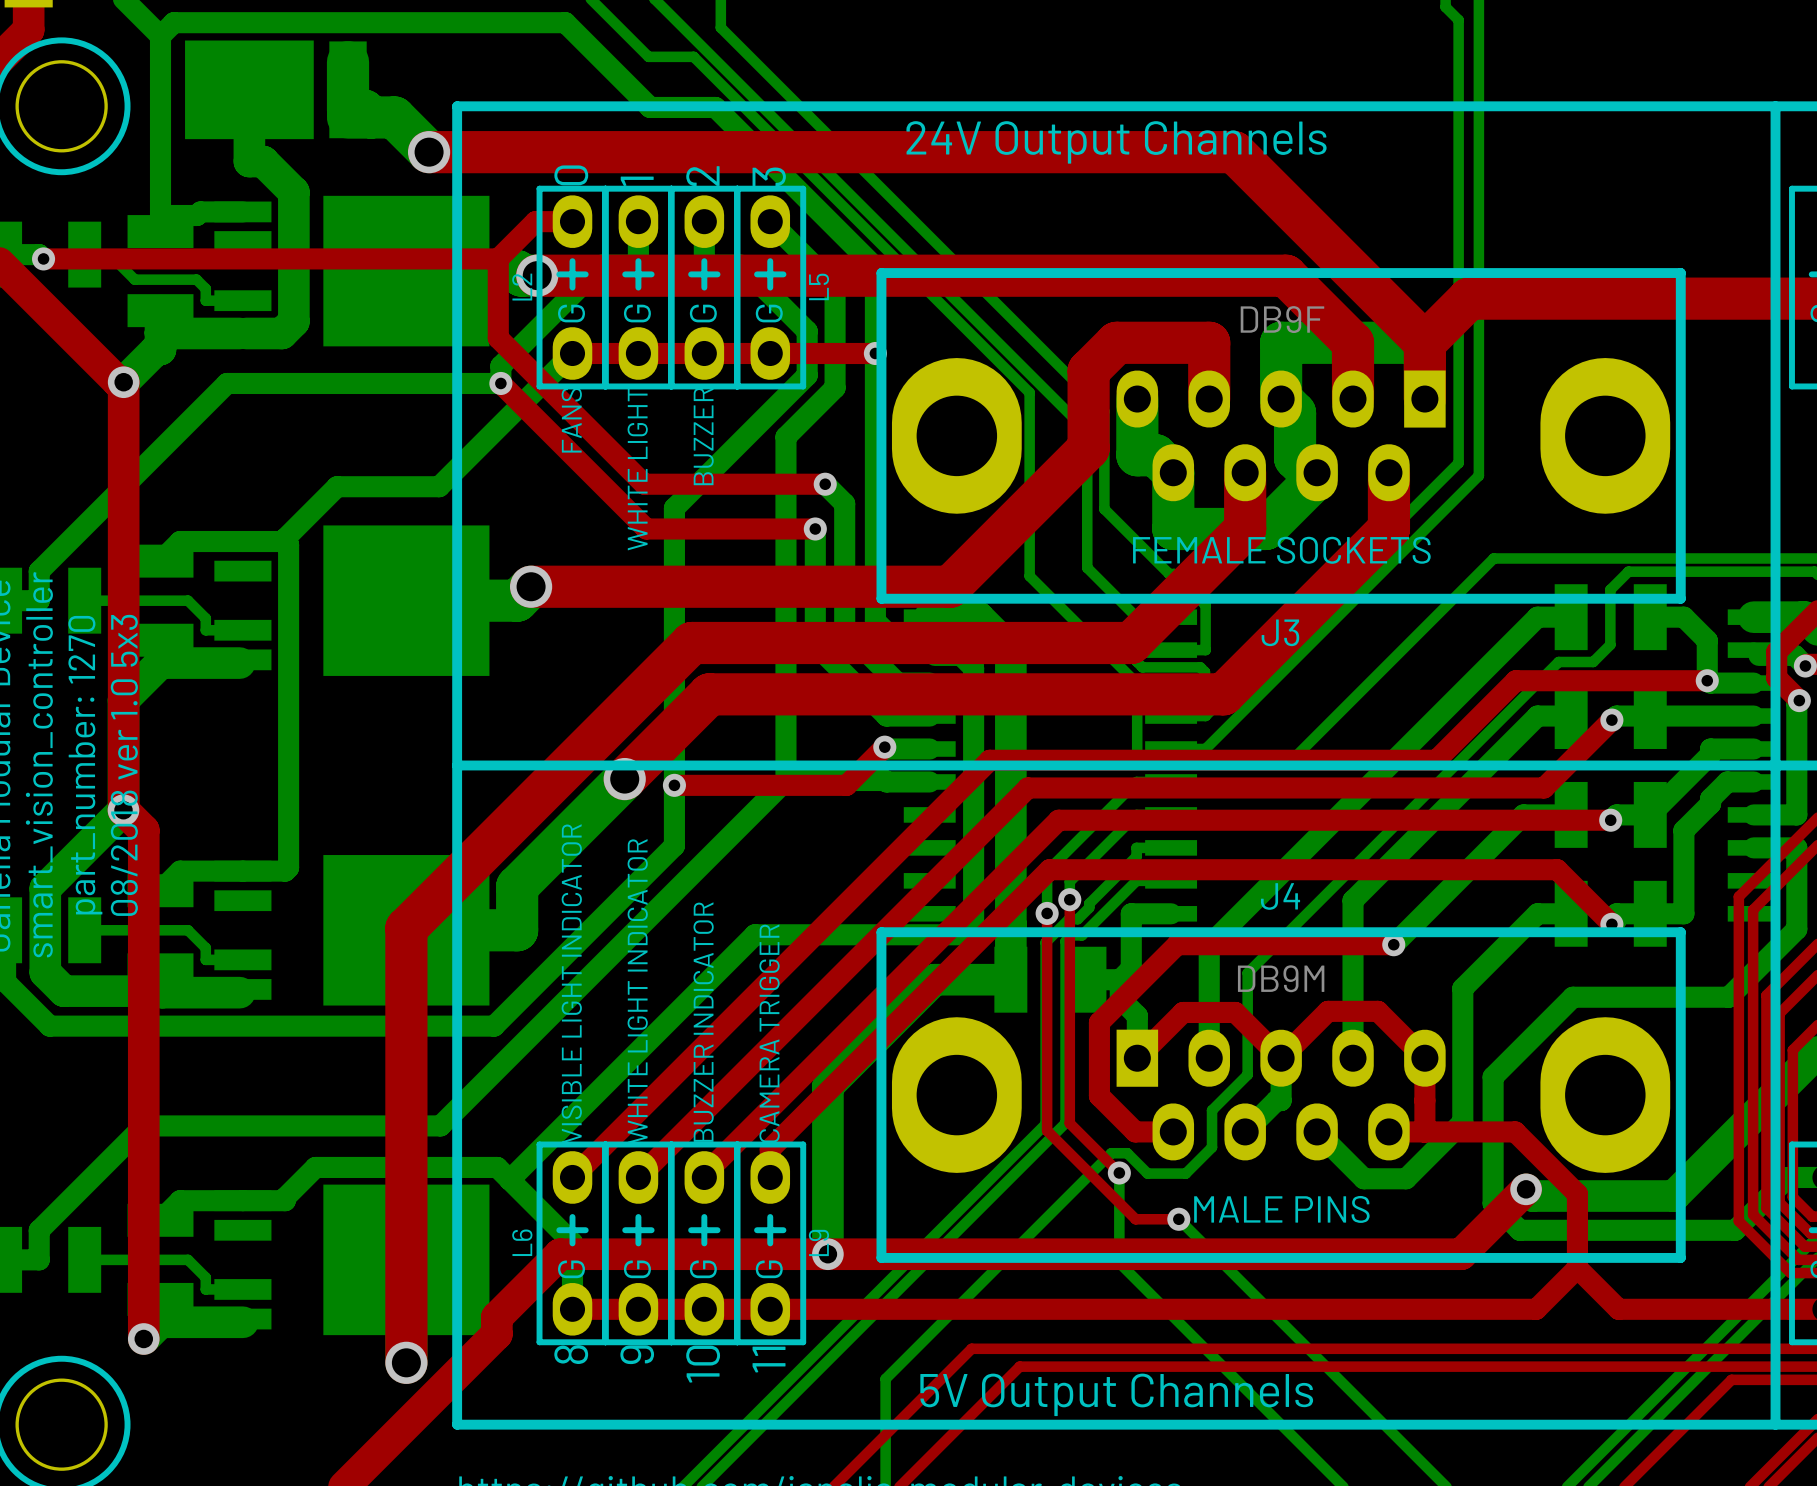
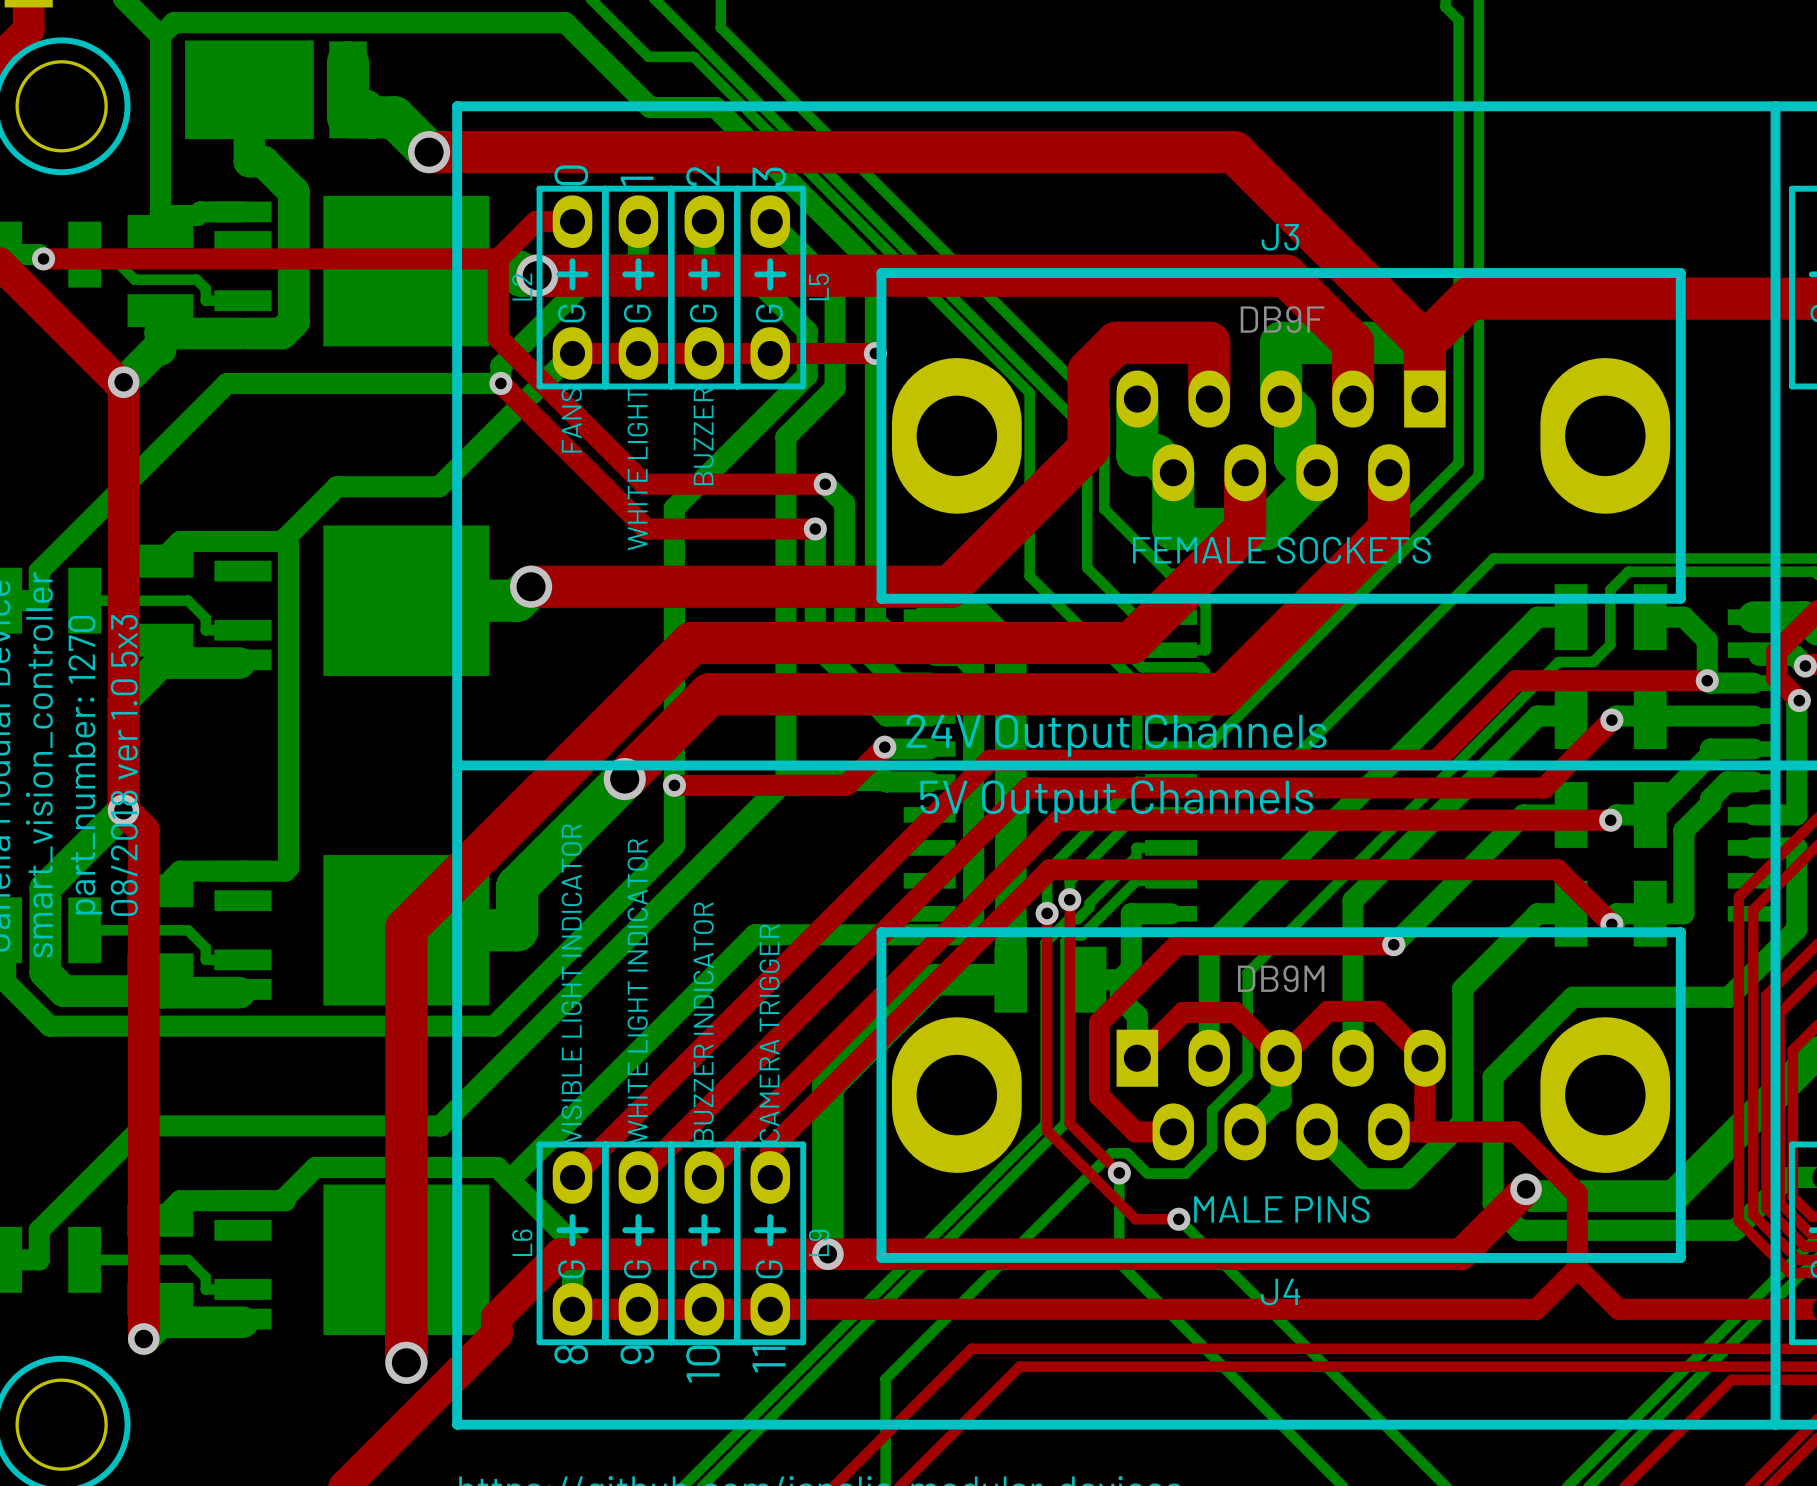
text position: 24V Output Channels (1116, 142) -> 24V Output Channels (1116, 735)
J3 name position: J3 (1280, 632) -> J3 (1280, 237)
J4 name position: J4 (1280, 896) -> J4 (1280, 1291)
text position: 5V Output Channels (1116, 1394) -> 5V Output Channels (1116, 801)

